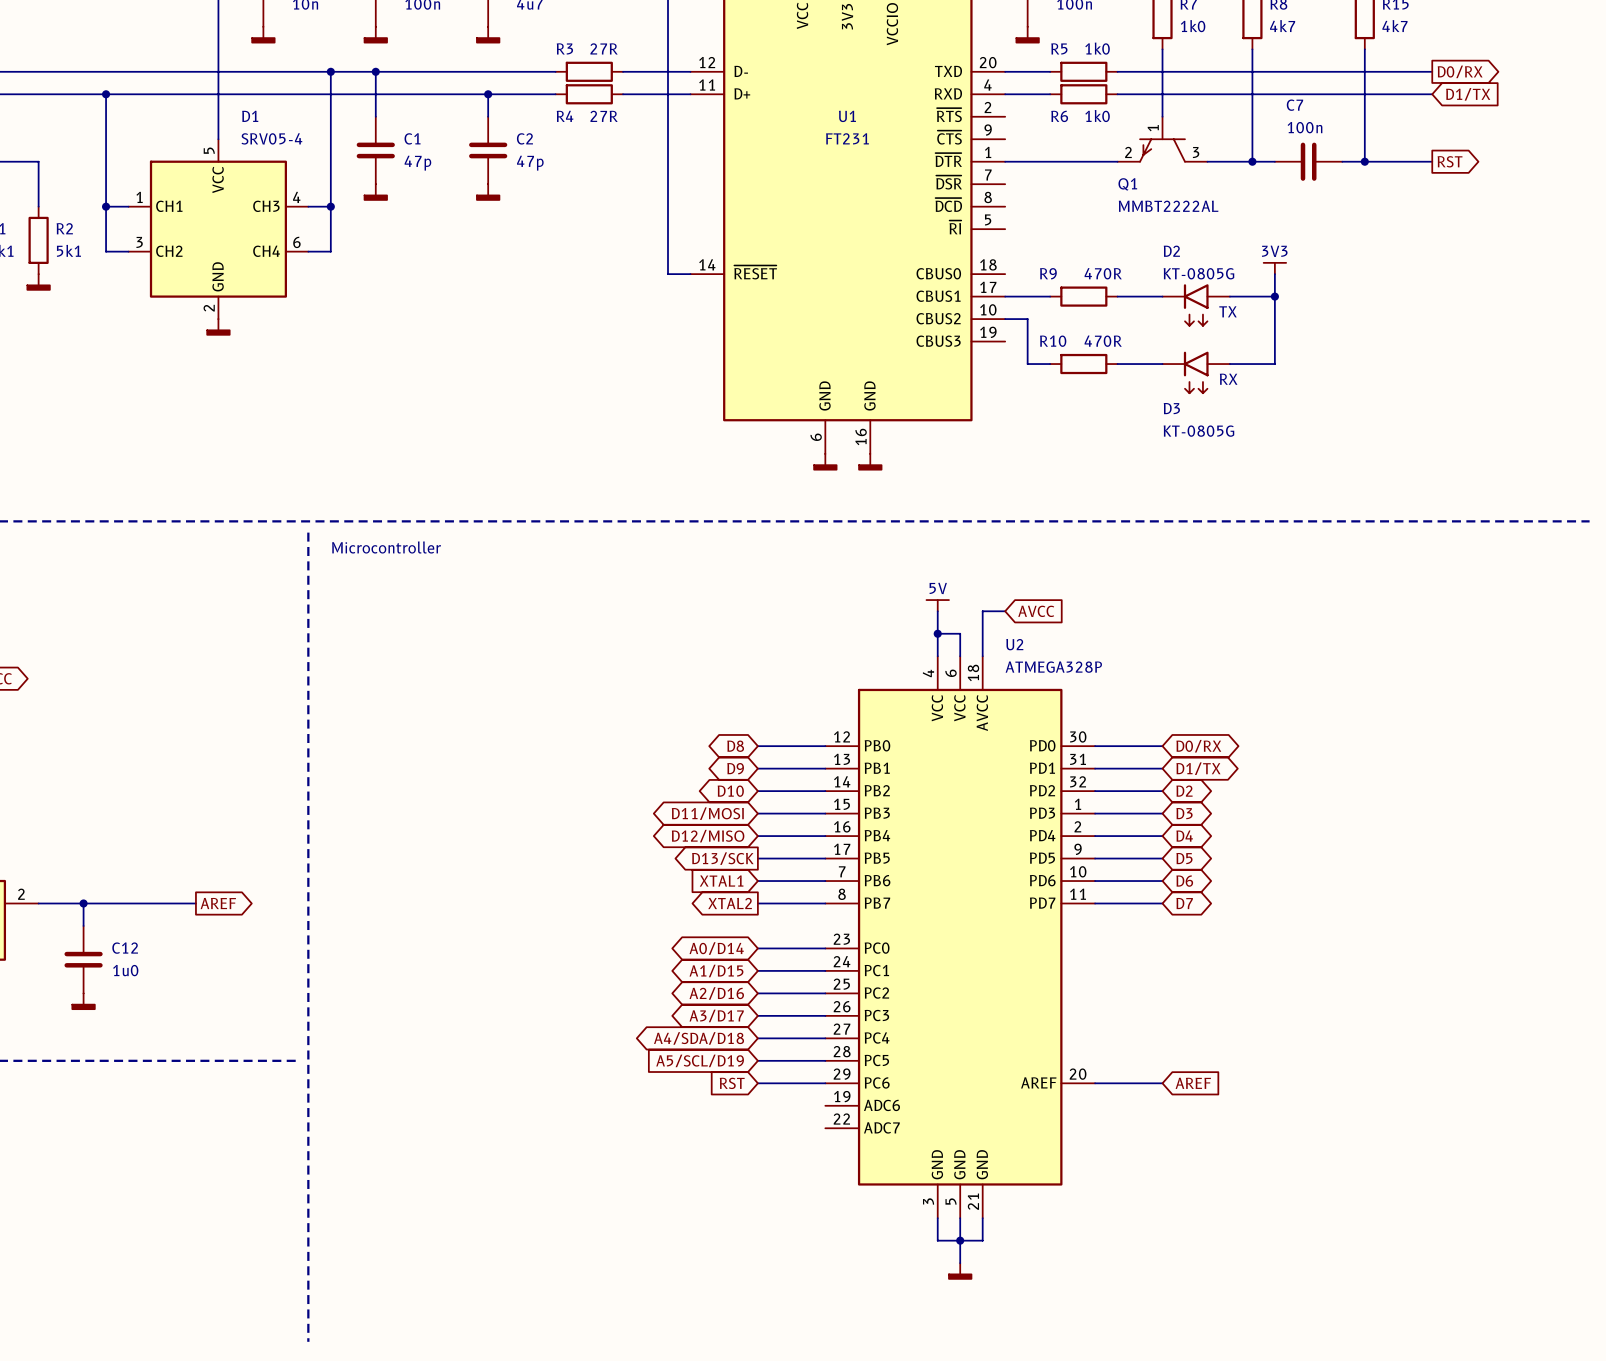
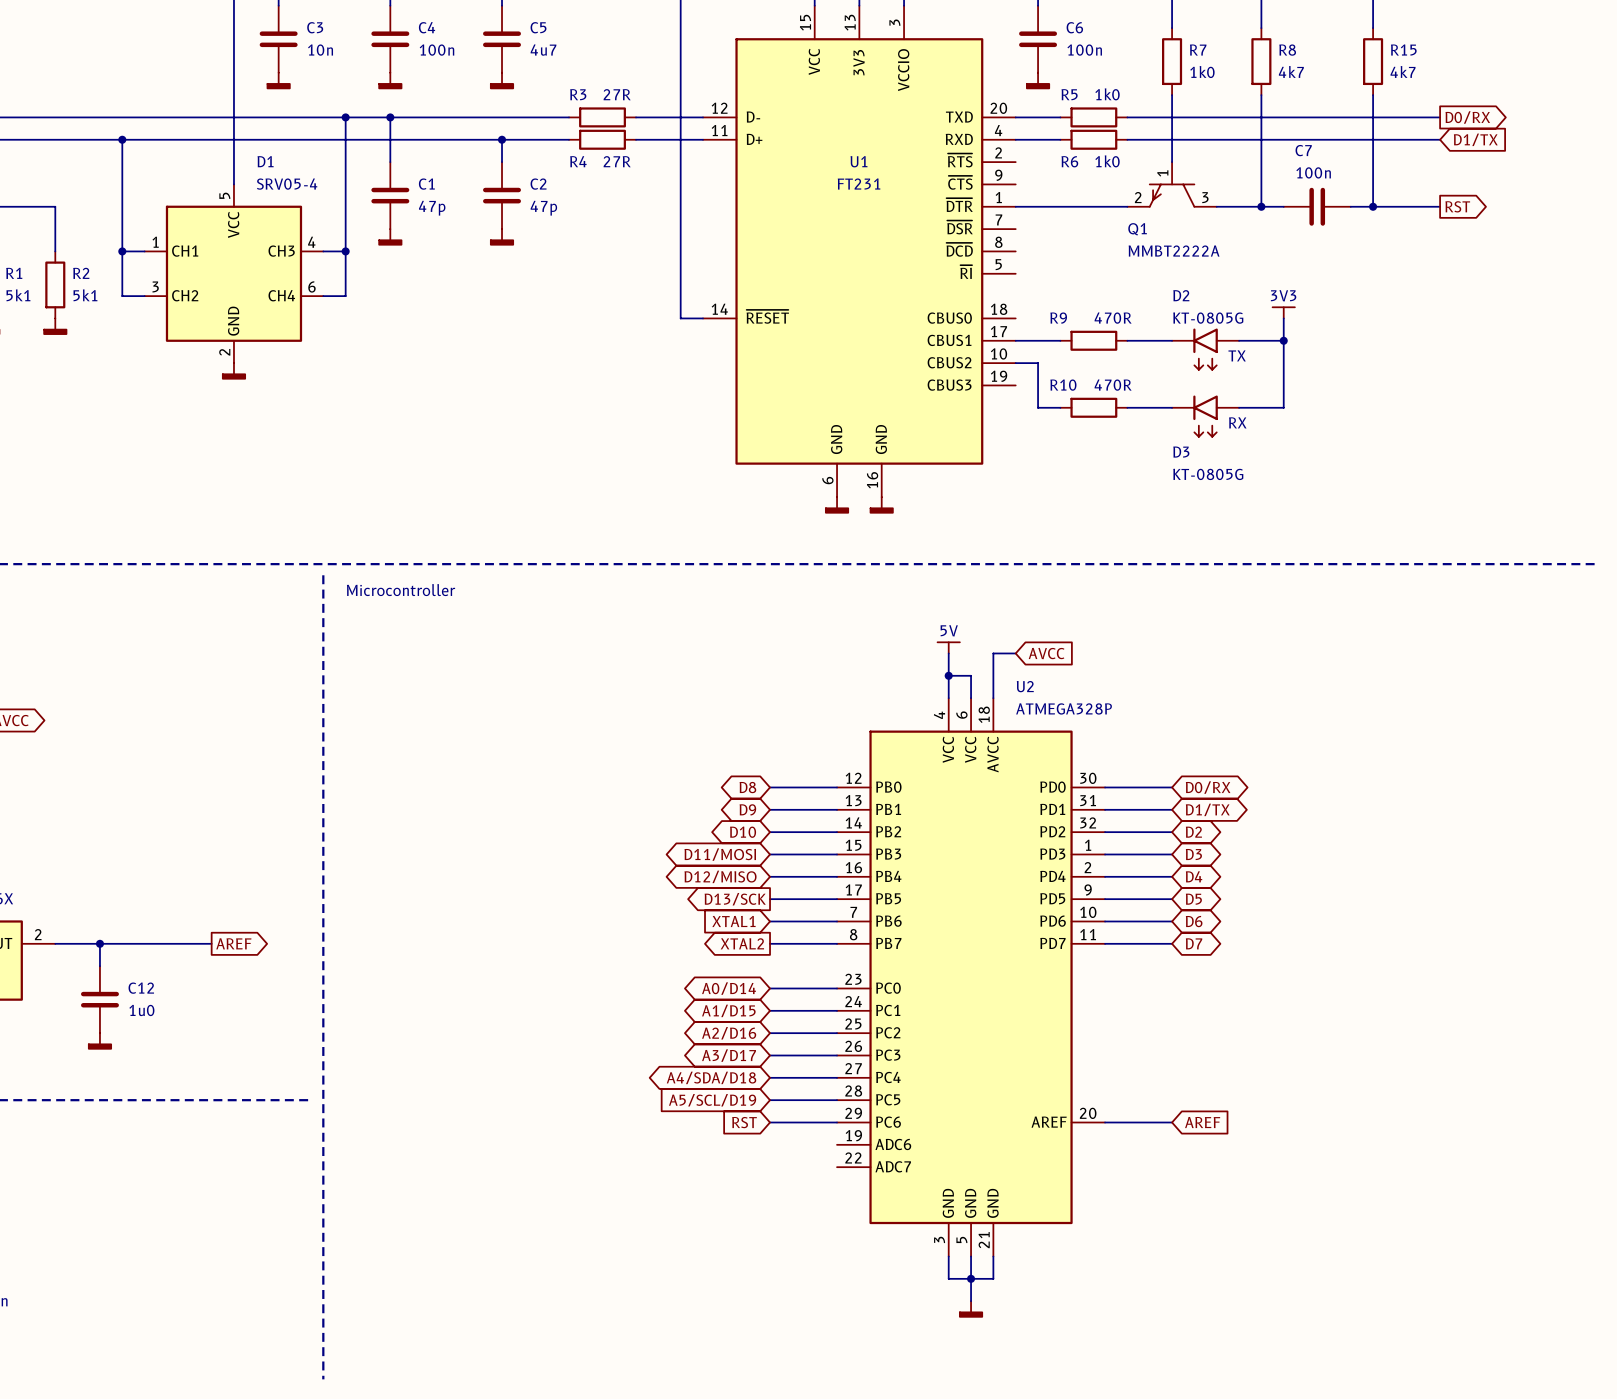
Q1 value: MMBT2222AL (1168, 206) -> MMBT2222A (1174, 251)

